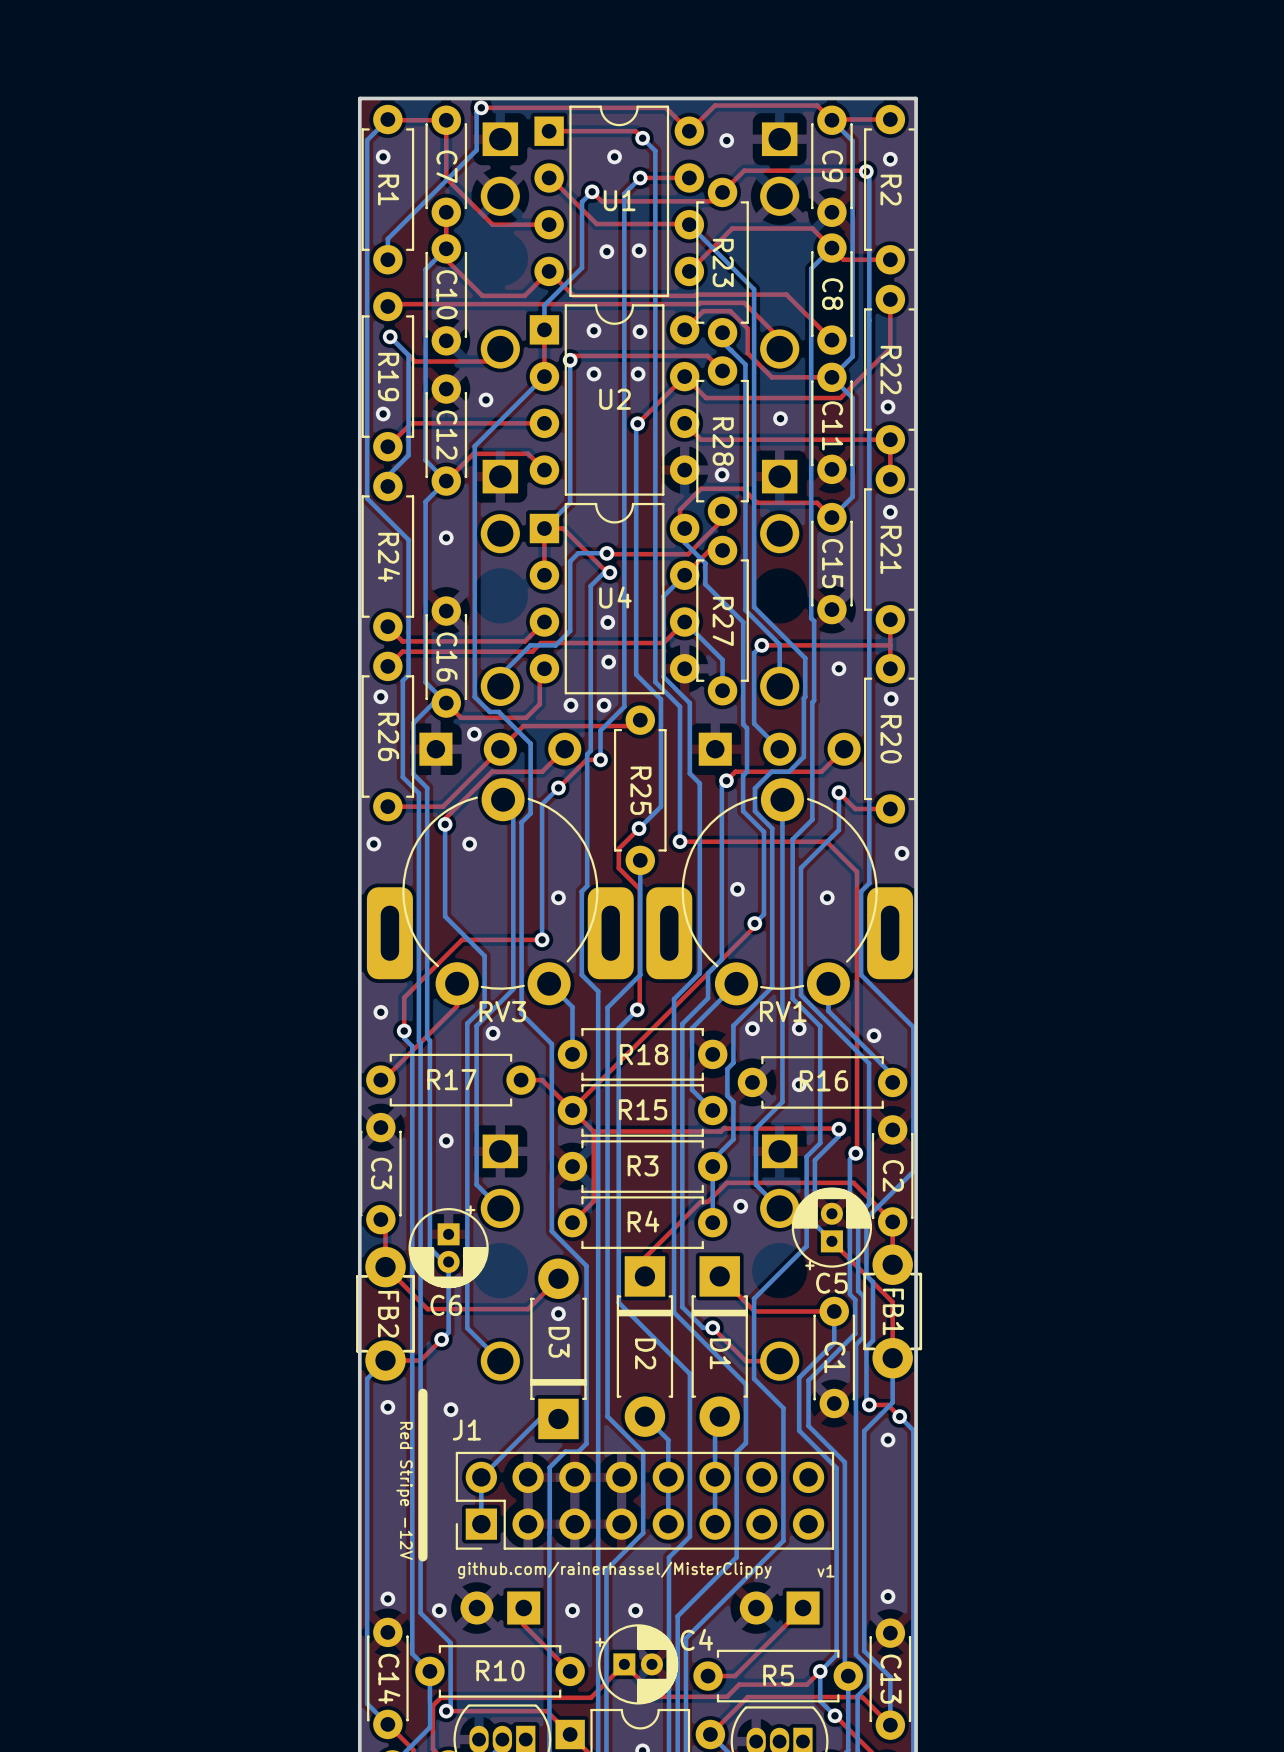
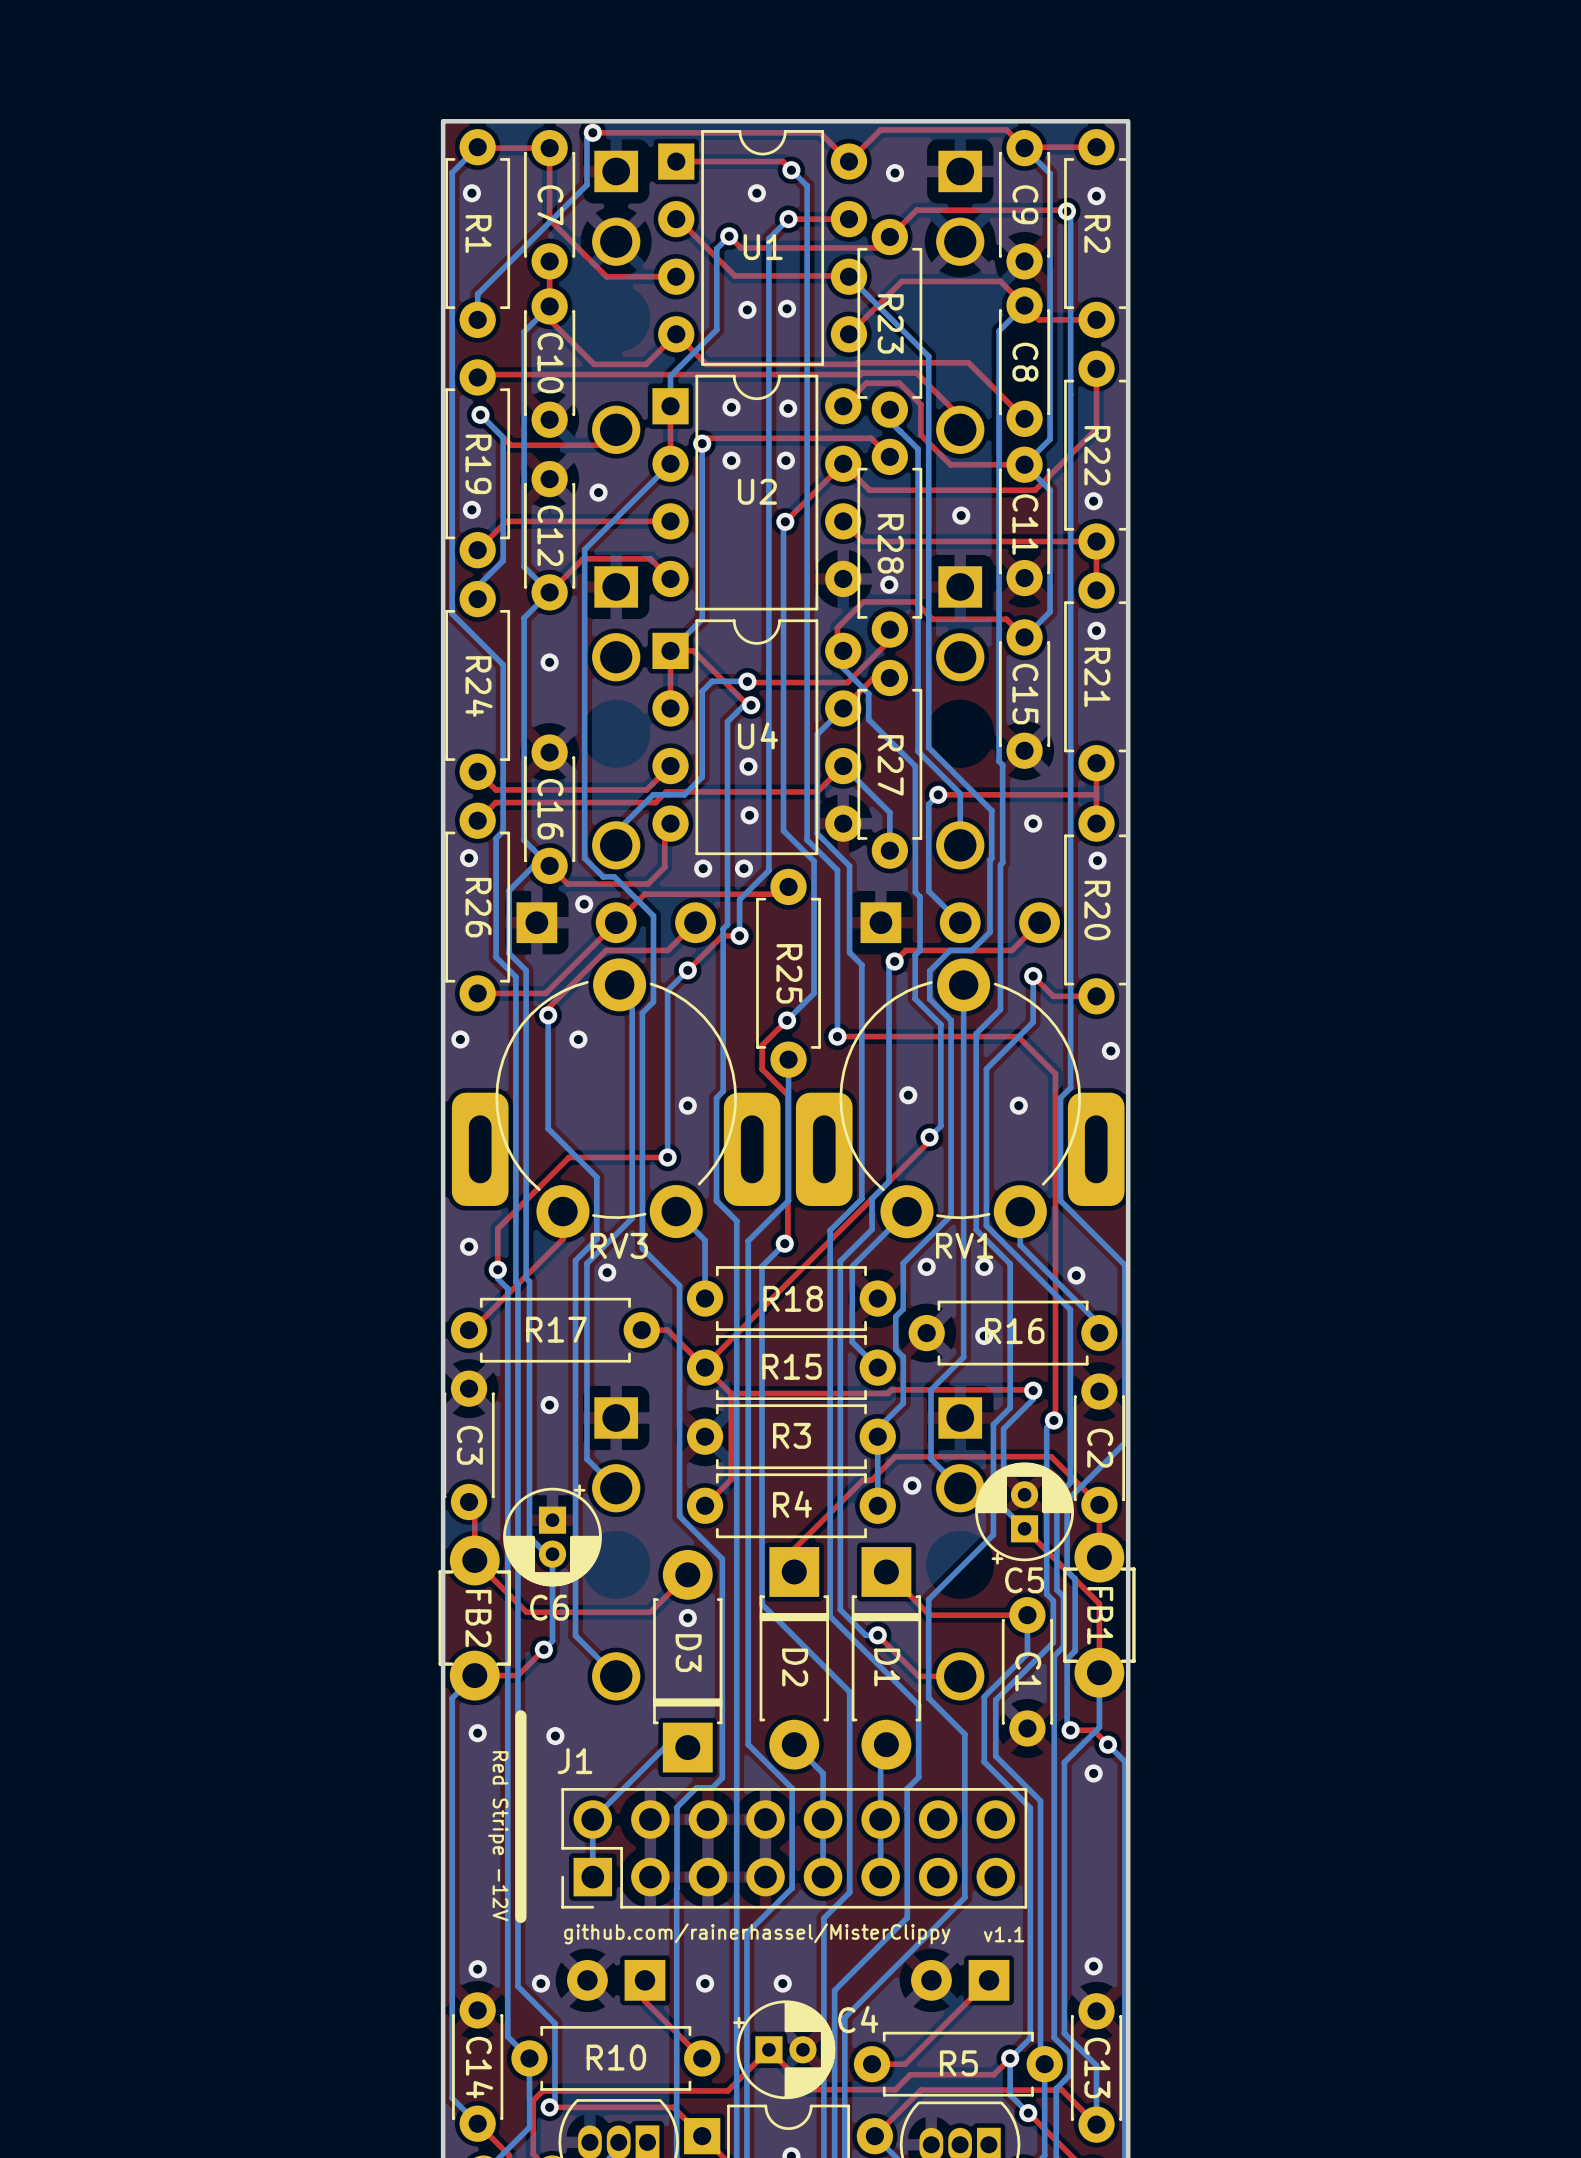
text: v1 (825, 1571) -> v1.1 (1004, 1934)

